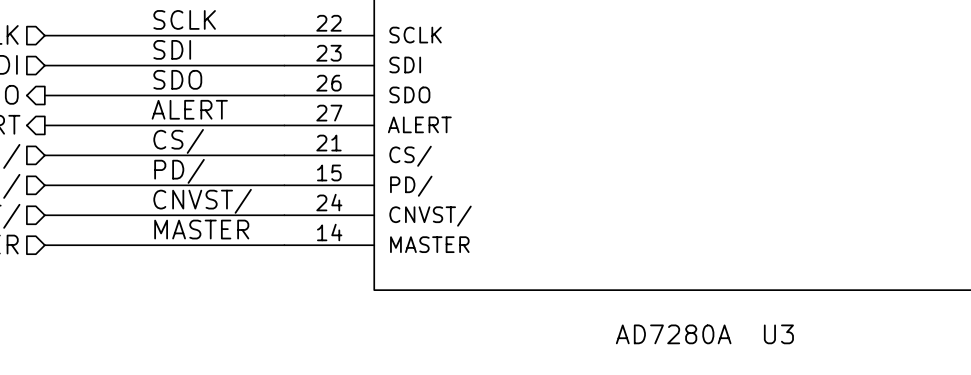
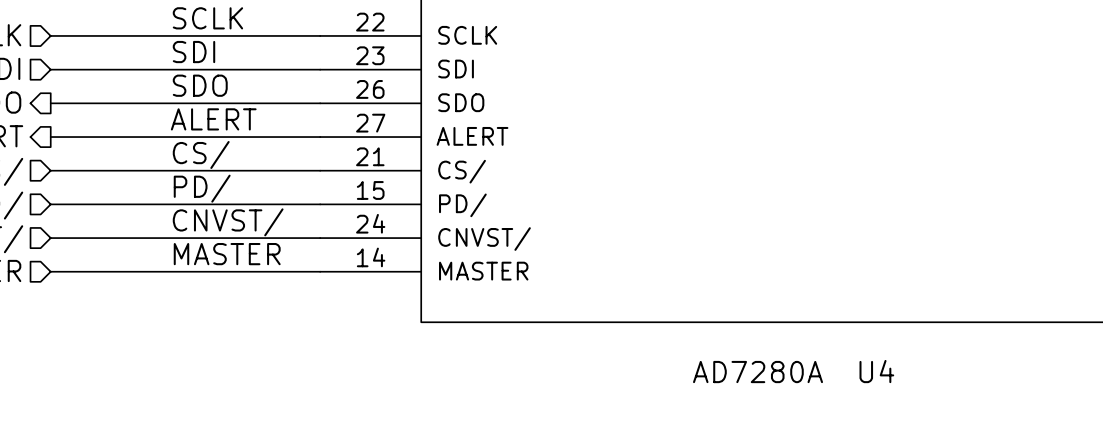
U3 name: U3 (778, 334) -> U4 (876, 371)

